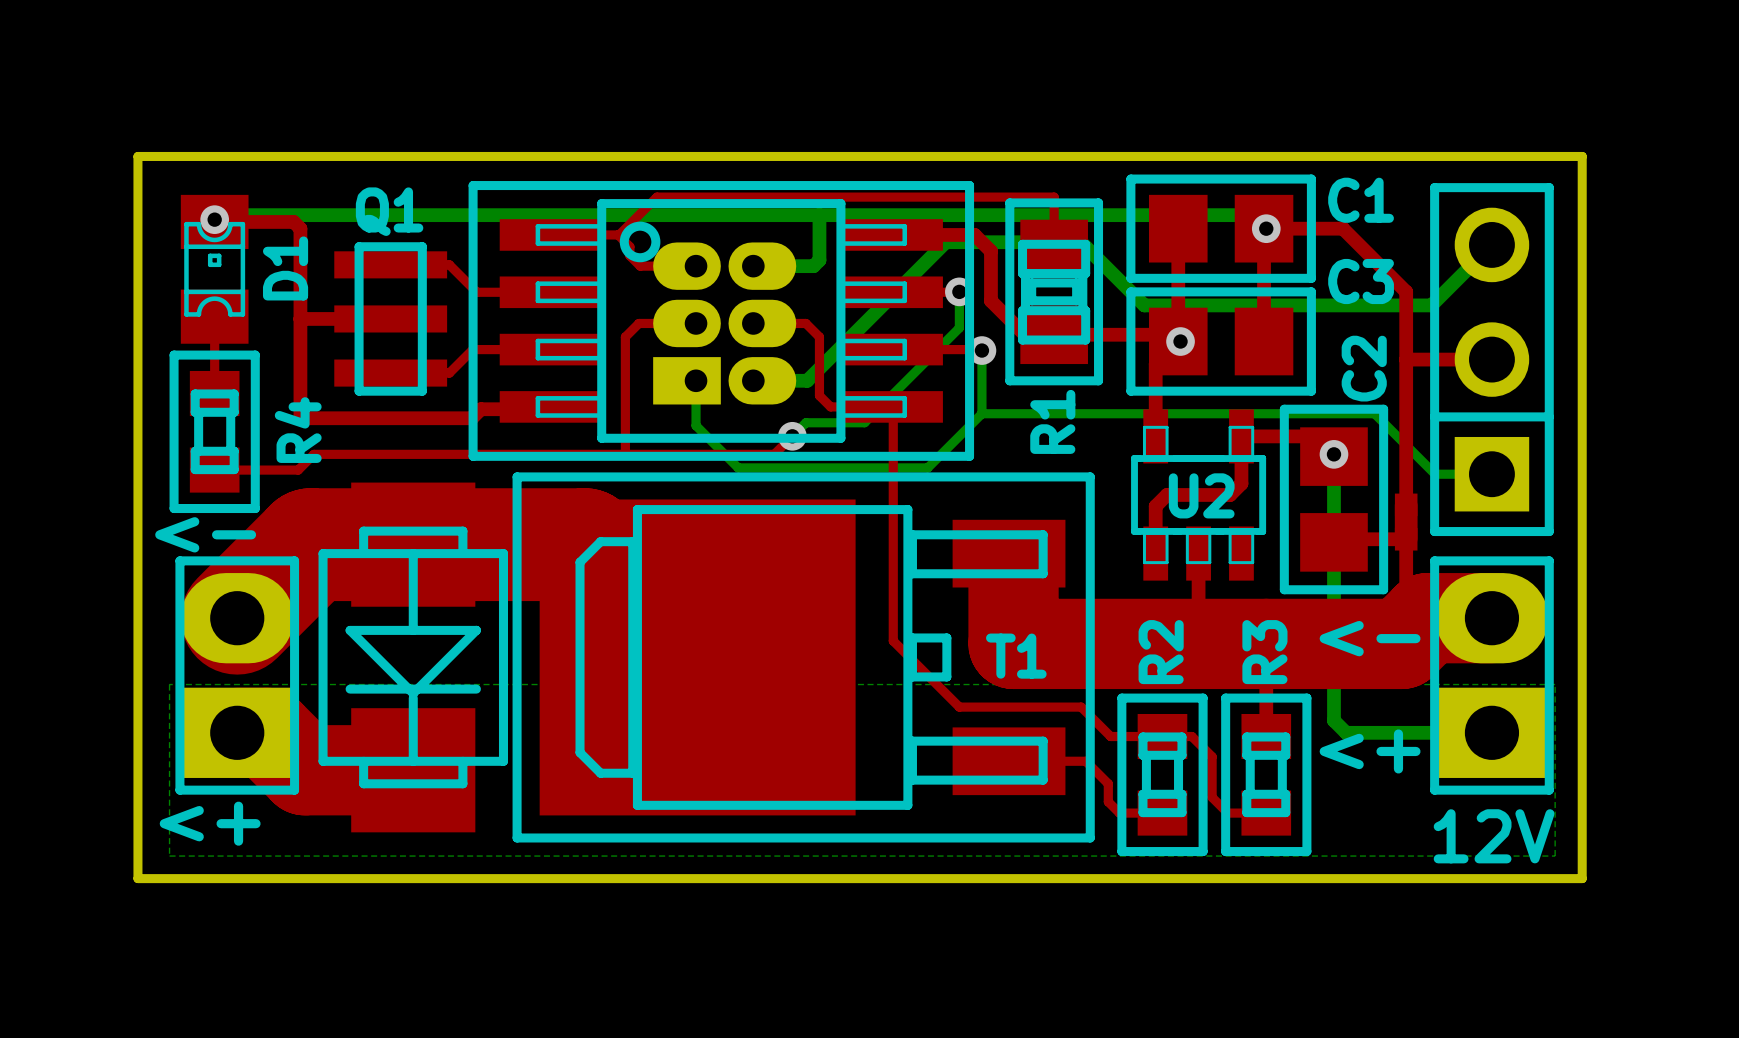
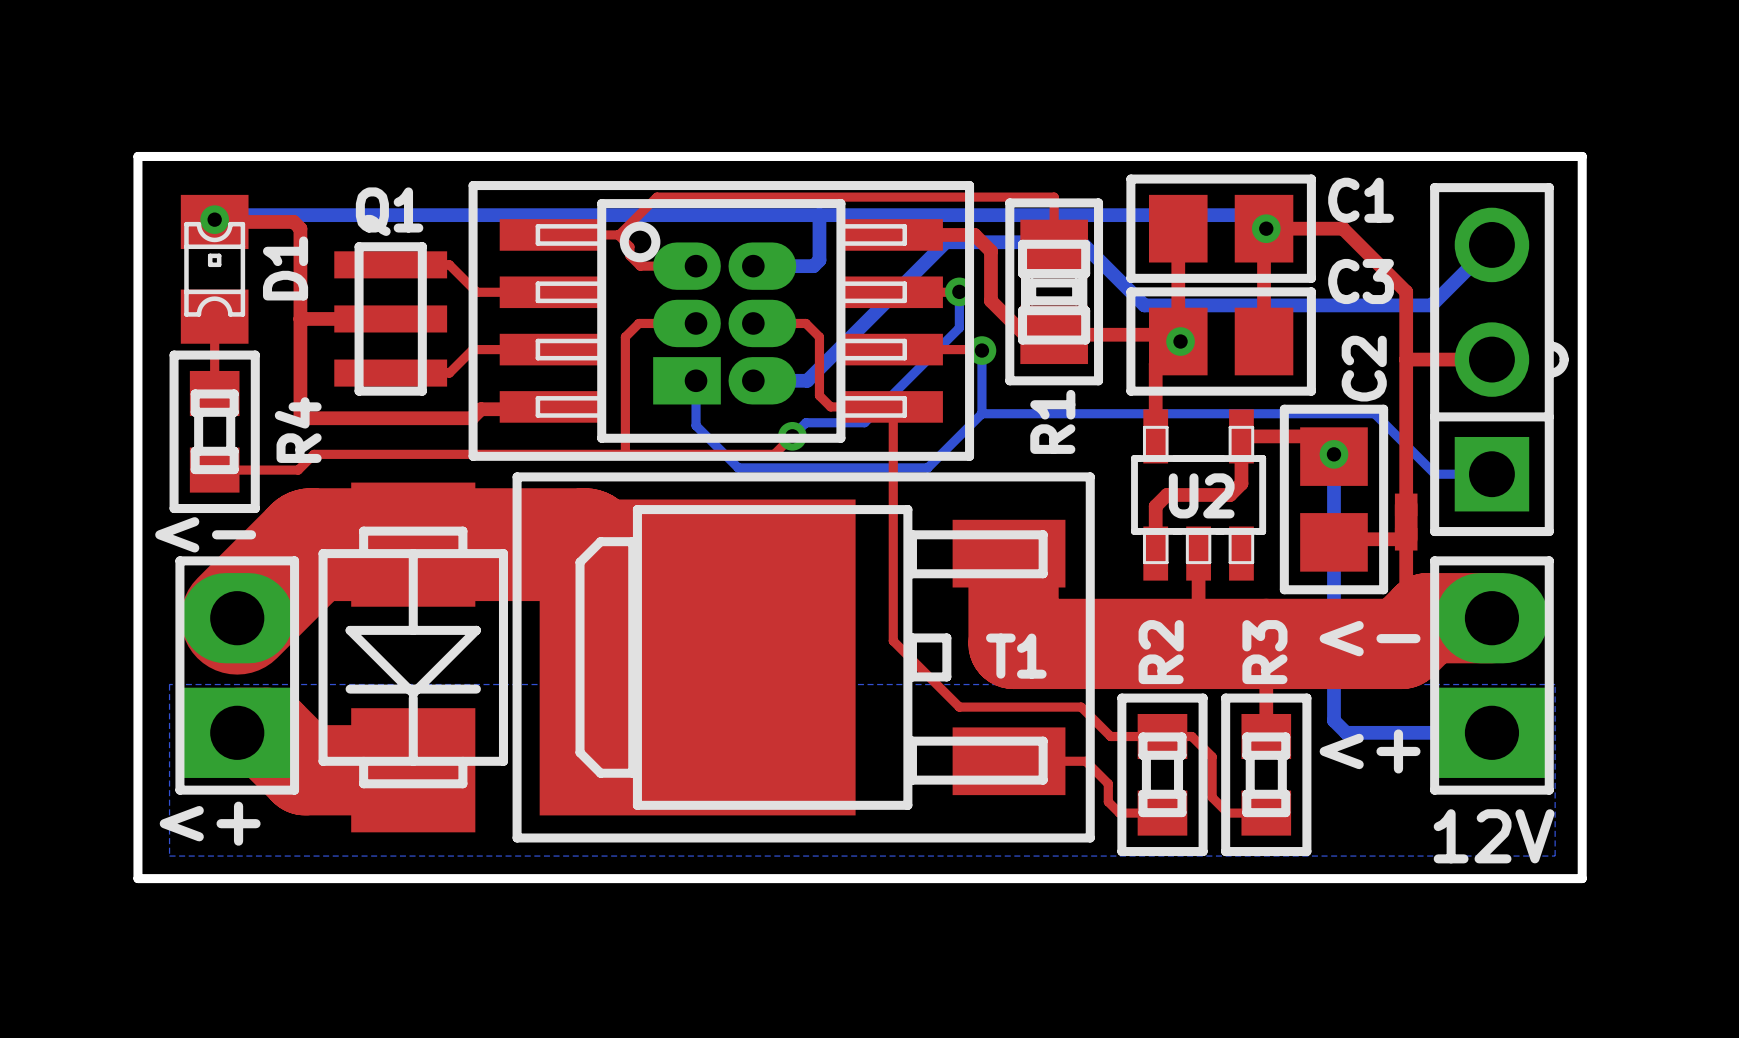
part footprint: [1430, 183, 1554, 537] -> [1430, 183, 1569, 537]

